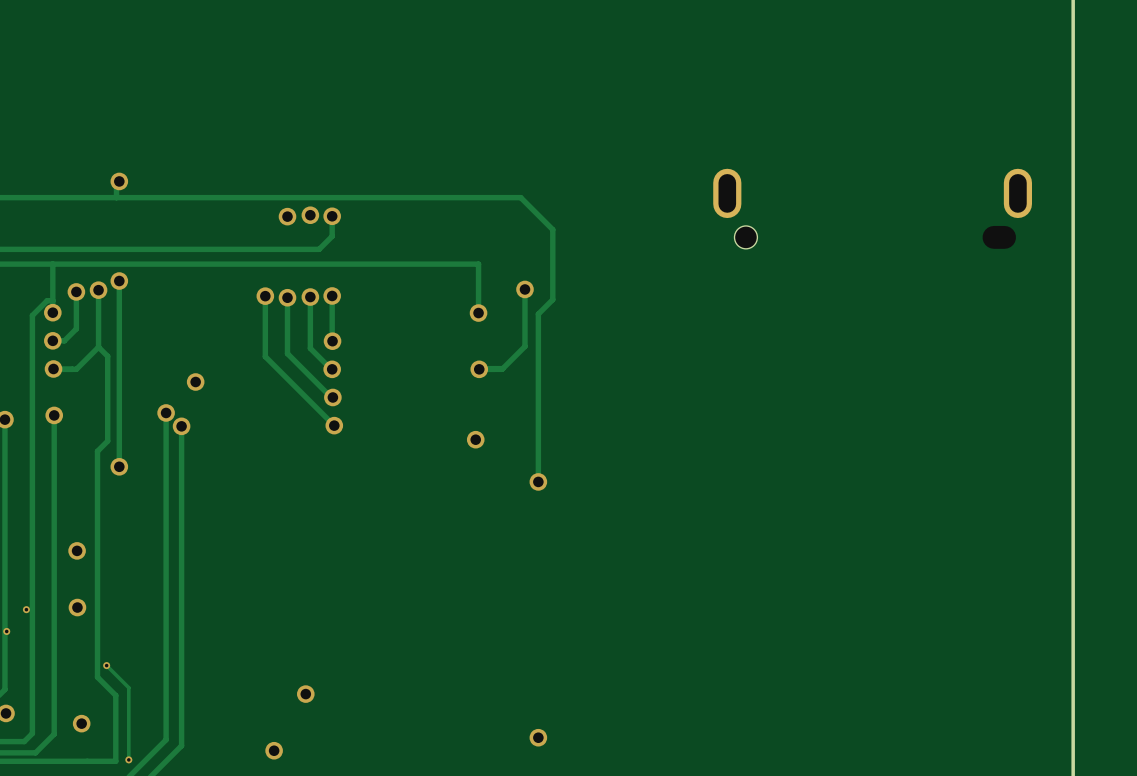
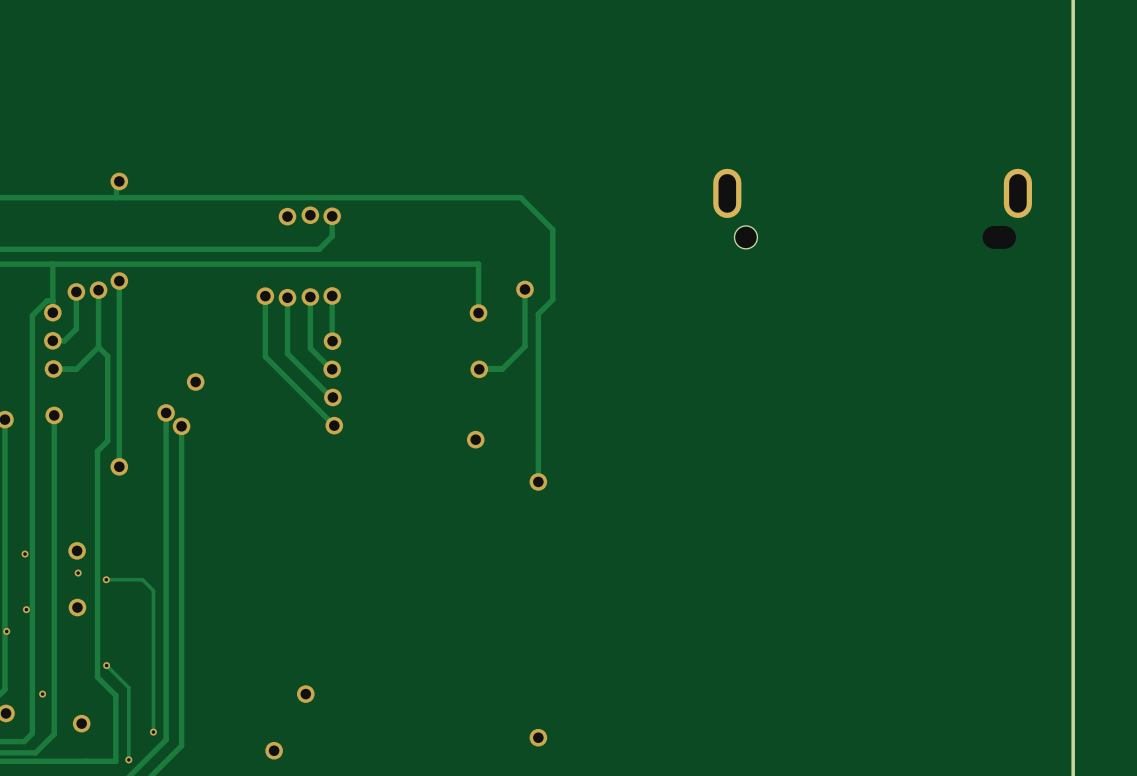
via: none -> (25, 554)
via: none -> (78, 573)
track: none -> (106, 579) (142, 579) (153, 590) (153, 732)
via: none -> (106, 579)
via: none -> (42, 694)
via: none -> (153, 732)

